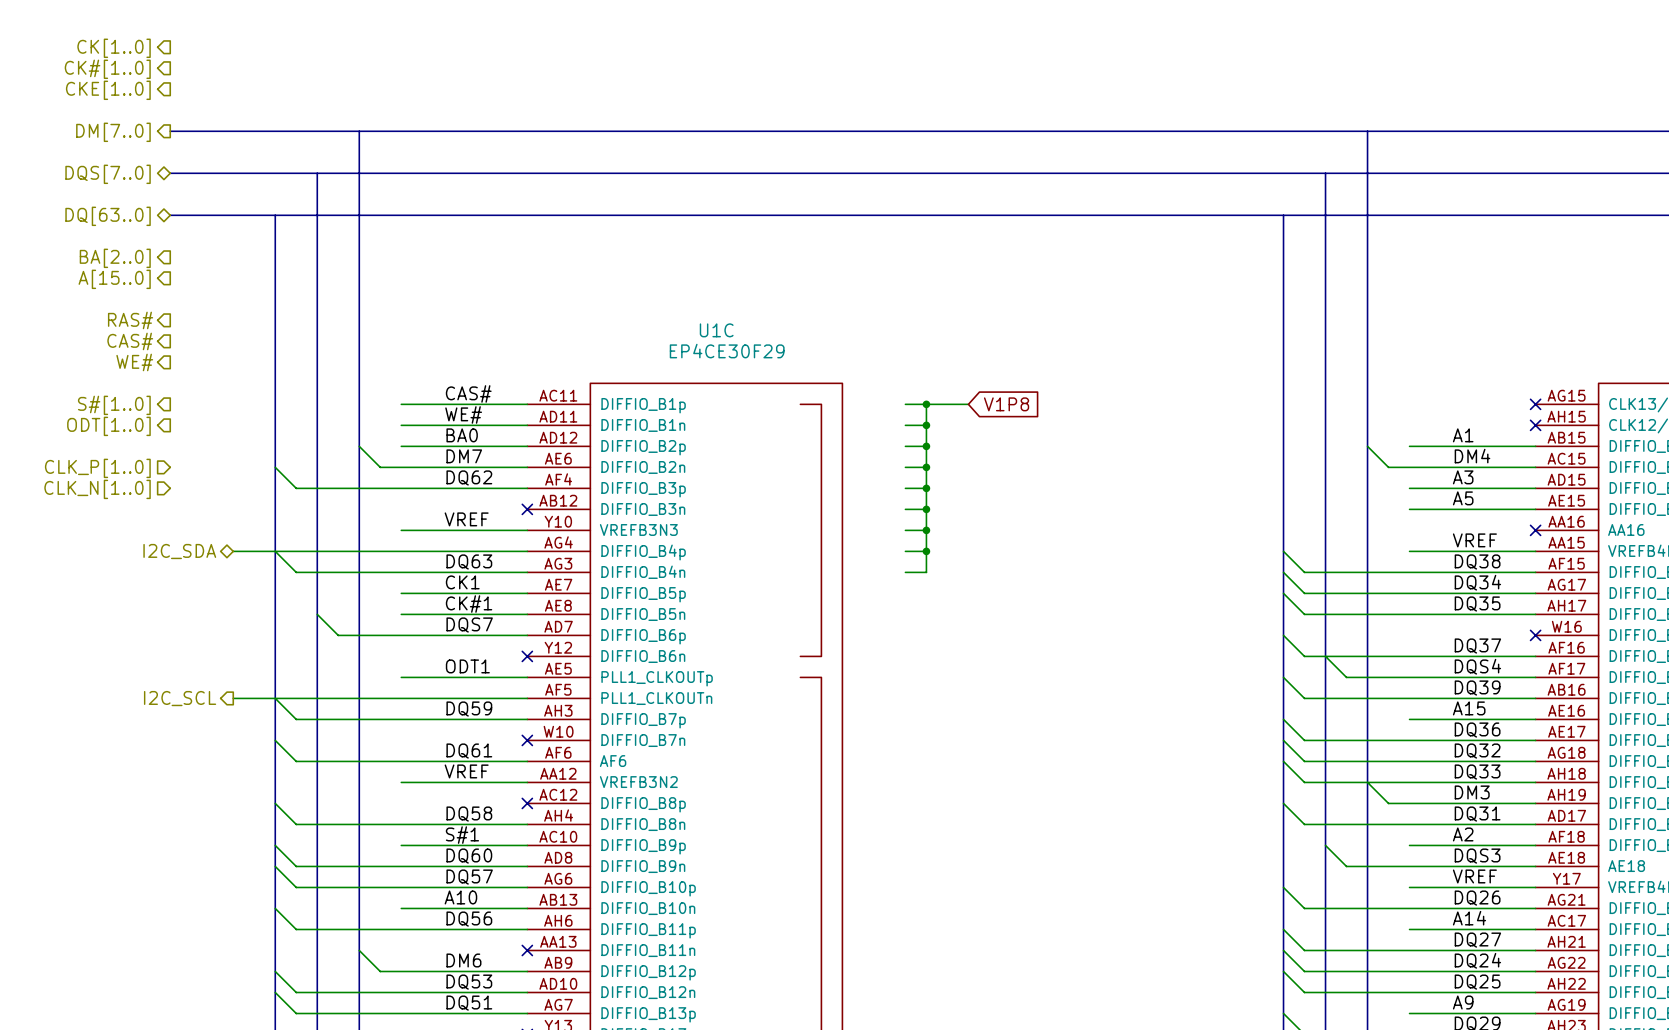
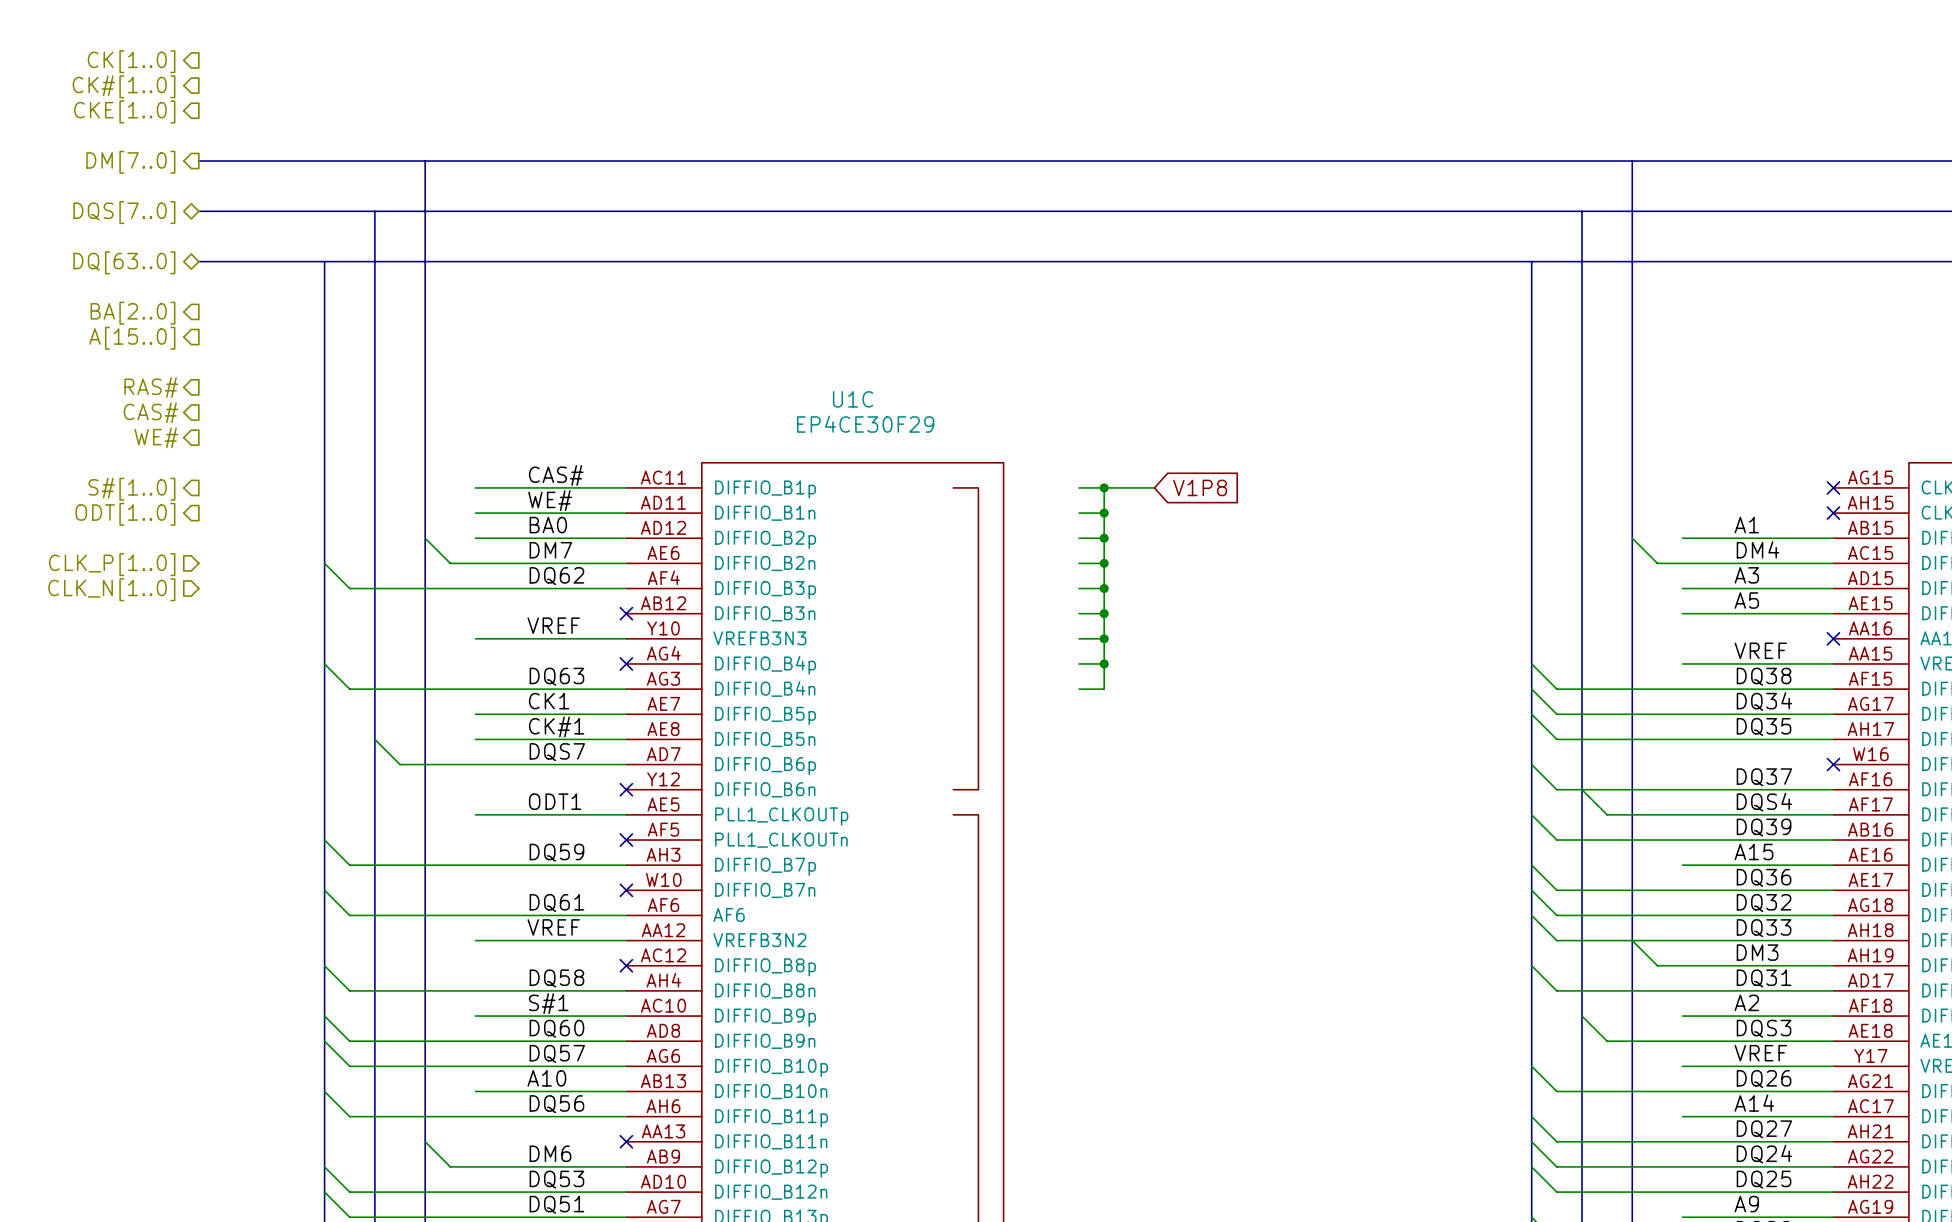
hierarchical label: I2C_SDA (179, 551) -> none
wire: (233, 551) (527, 551) -> none
no-connect mark: none -> (626, 663)
hierarchical label: I2C_SCL (180, 698) -> none
wire: (233, 698) (527, 698) -> none
no-connect mark: none -> (626, 840)

